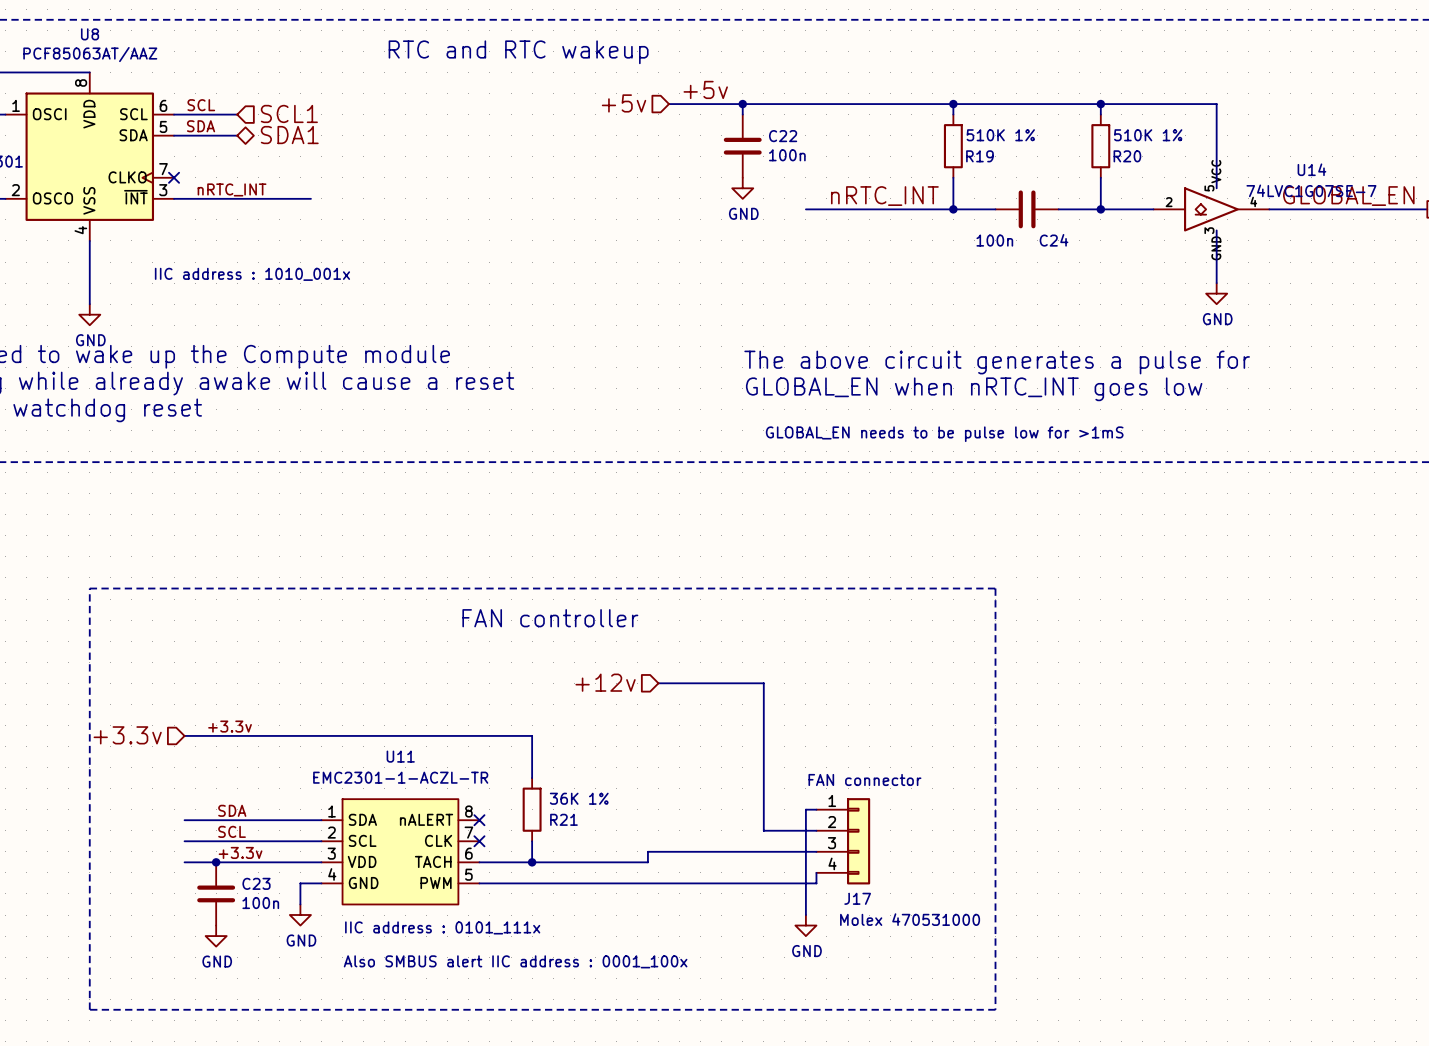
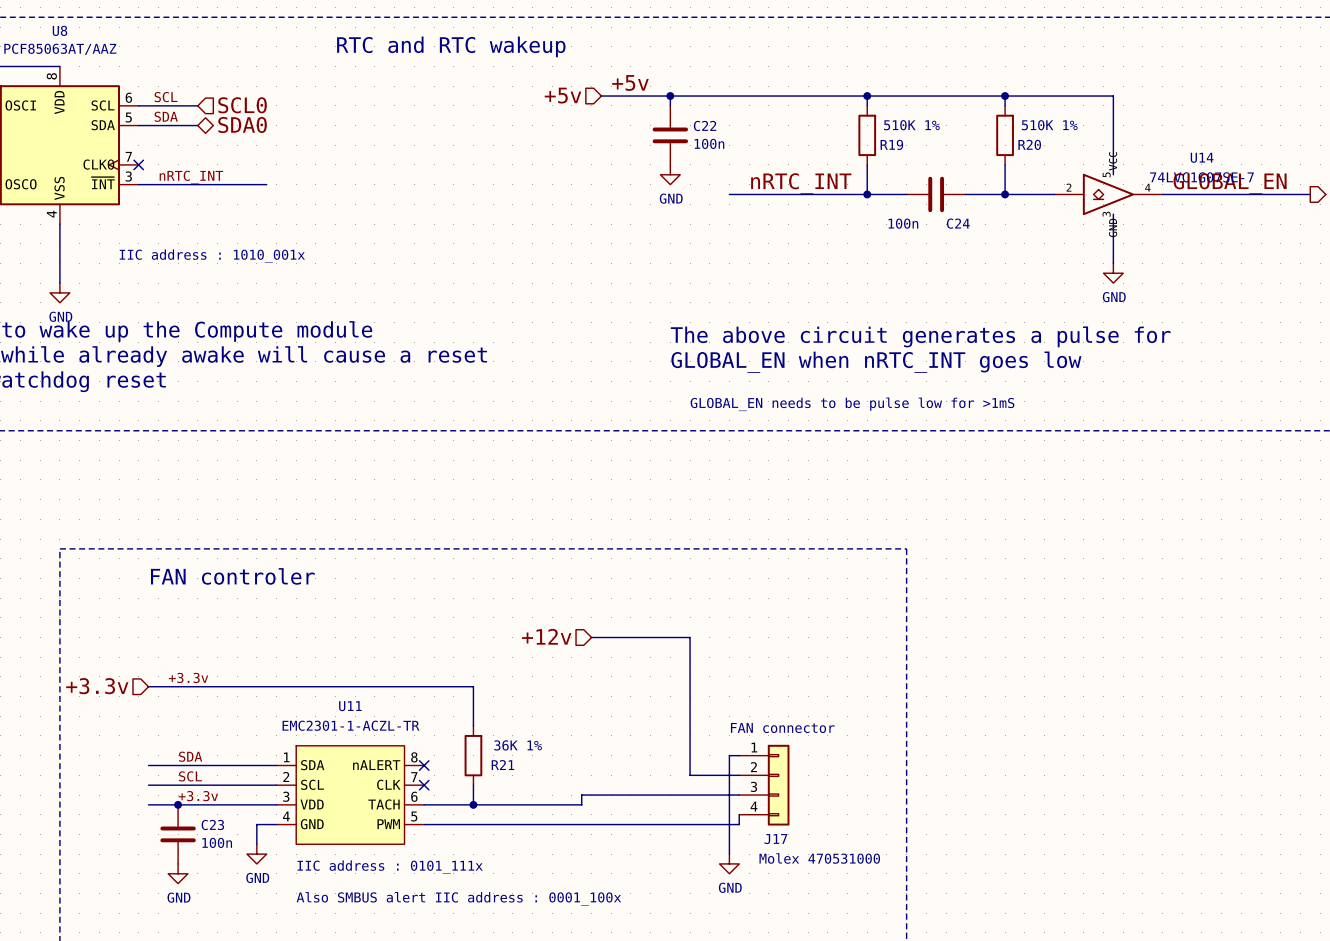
hierarchical label: SCL1 (289, 113) -> SCL0 (242, 105)
hierarchical label: SDA1 (289, 135) -> SDA0 (242, 124)
text: none -> FAN controler (232, 576)
text: FAN controller (550, 618) -> none

